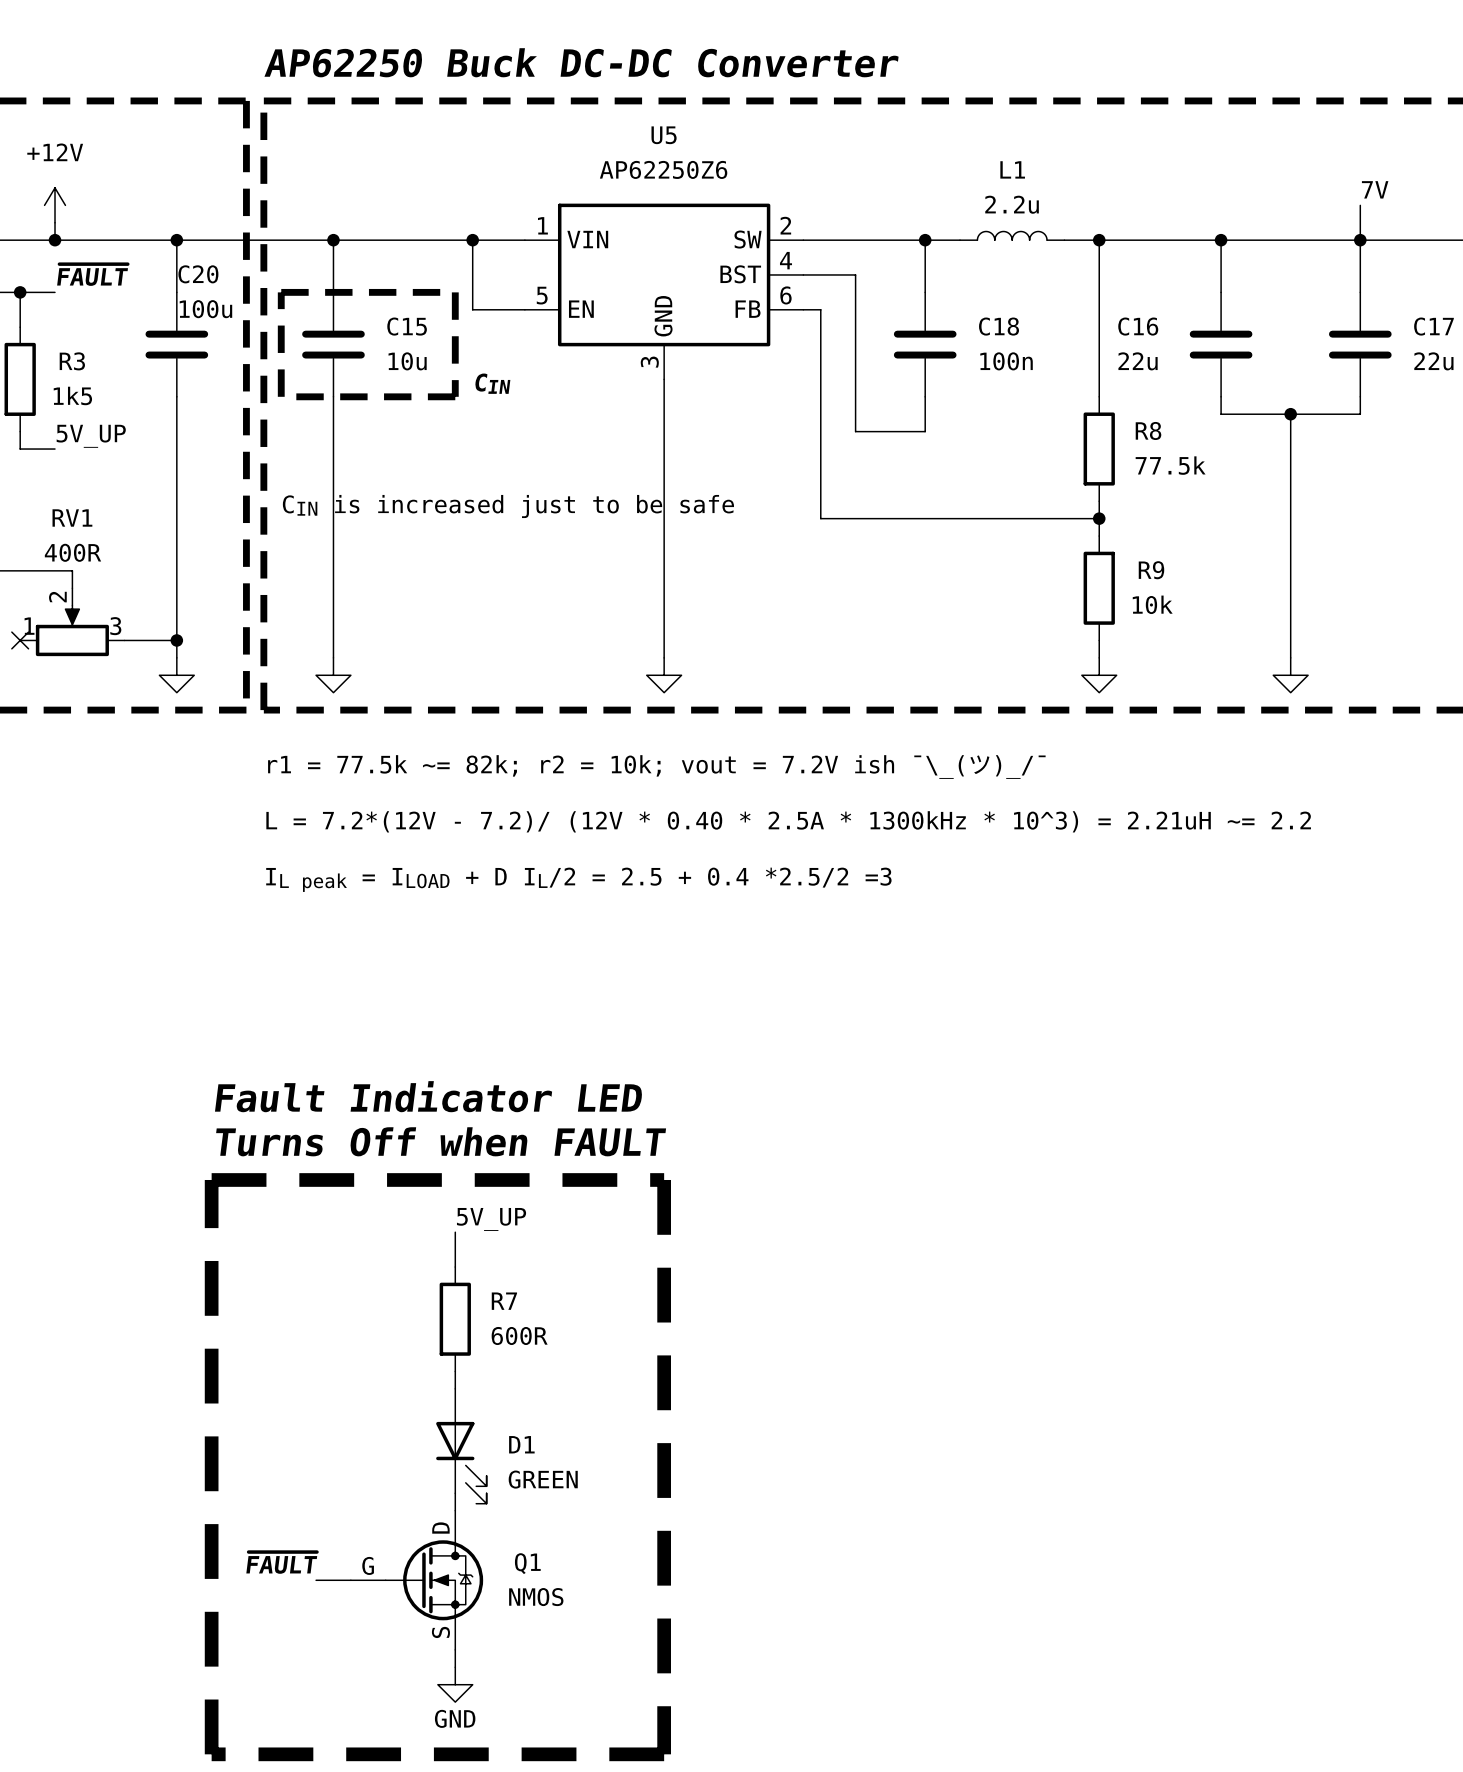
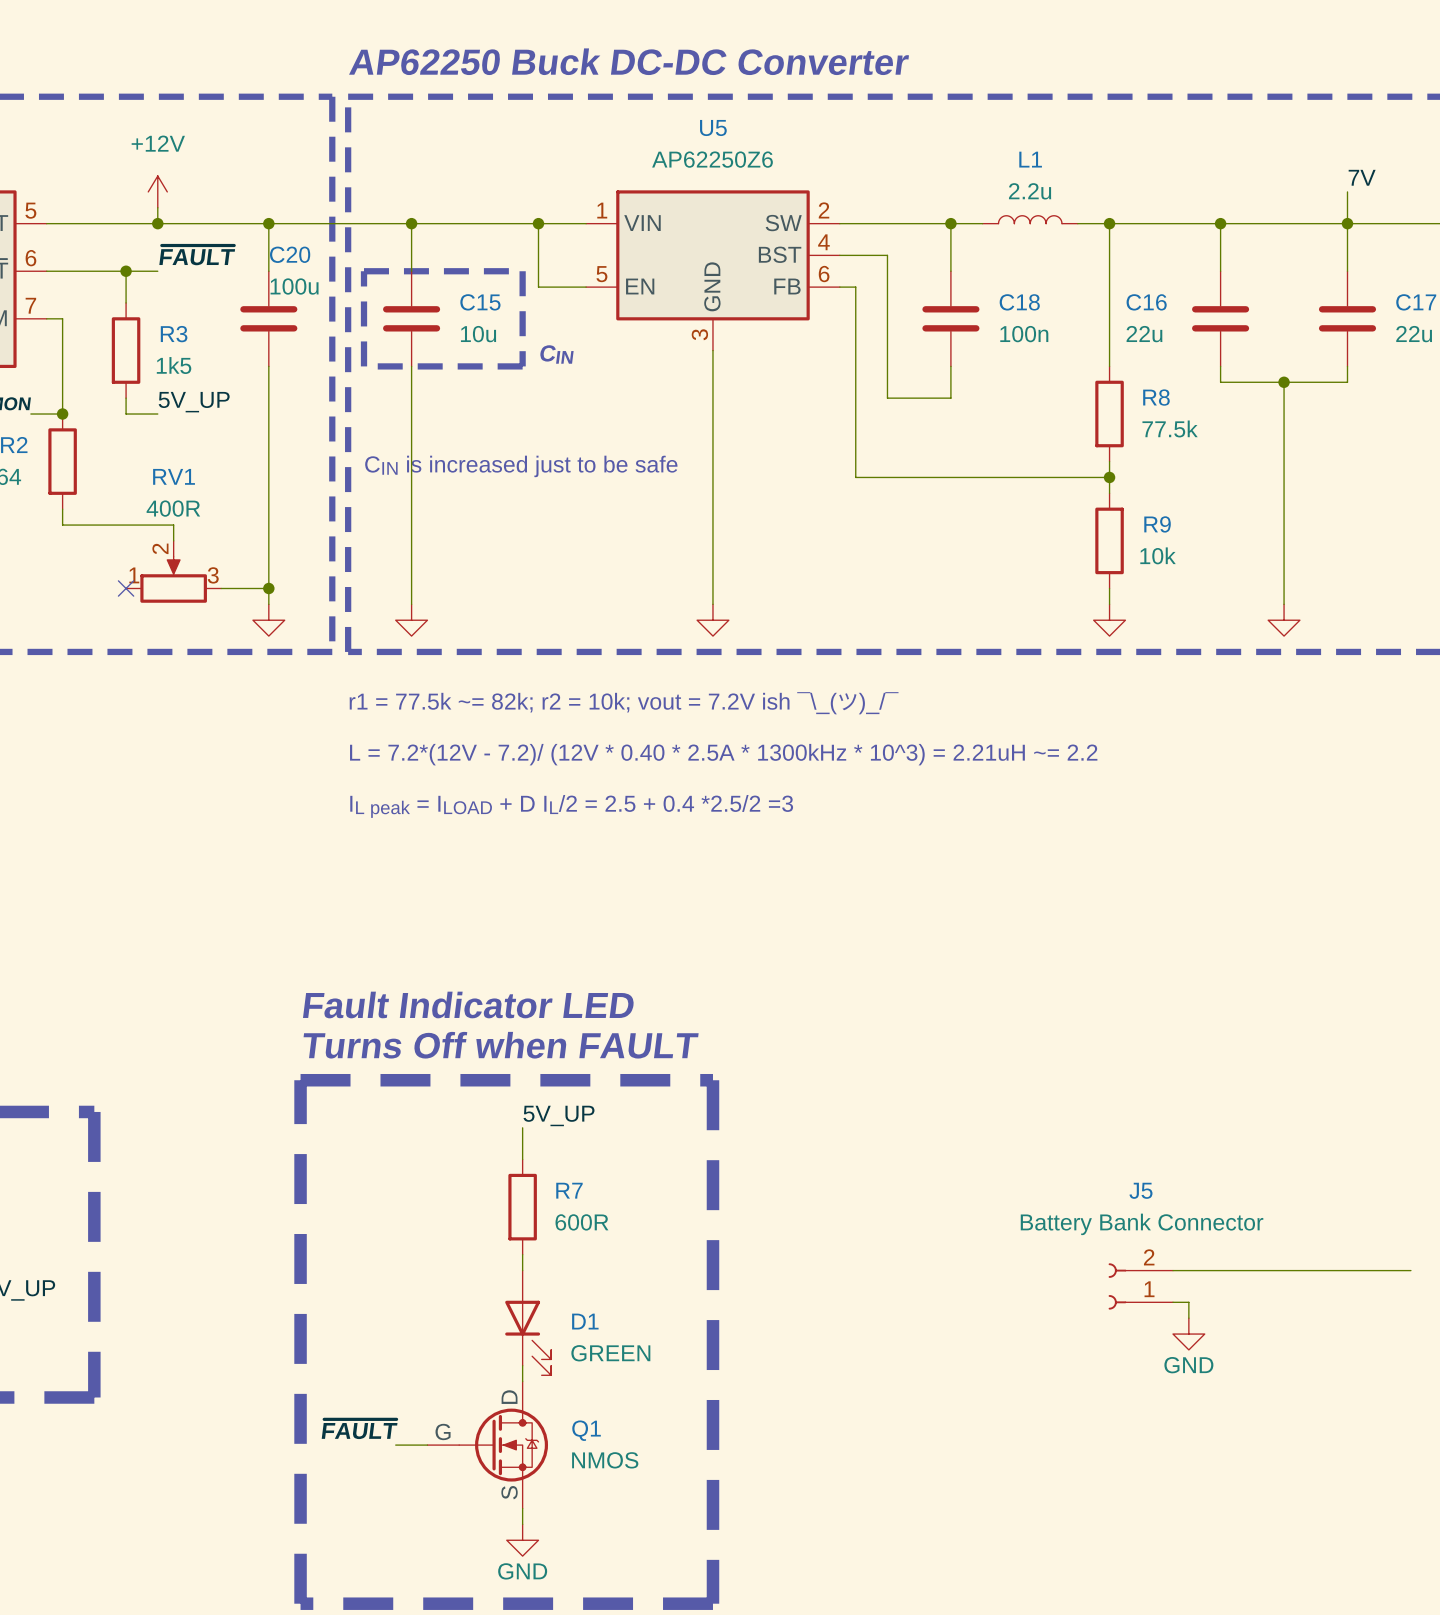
wire: none -> (1173, 1270) (1410, 1270)
J5: none -> Battery Bank Connector (1140, 1286)
wire: none -> (1173, 1302) (1188, 1302) (1188, 1318)
power symbol: none -> GND (1188, 1334)

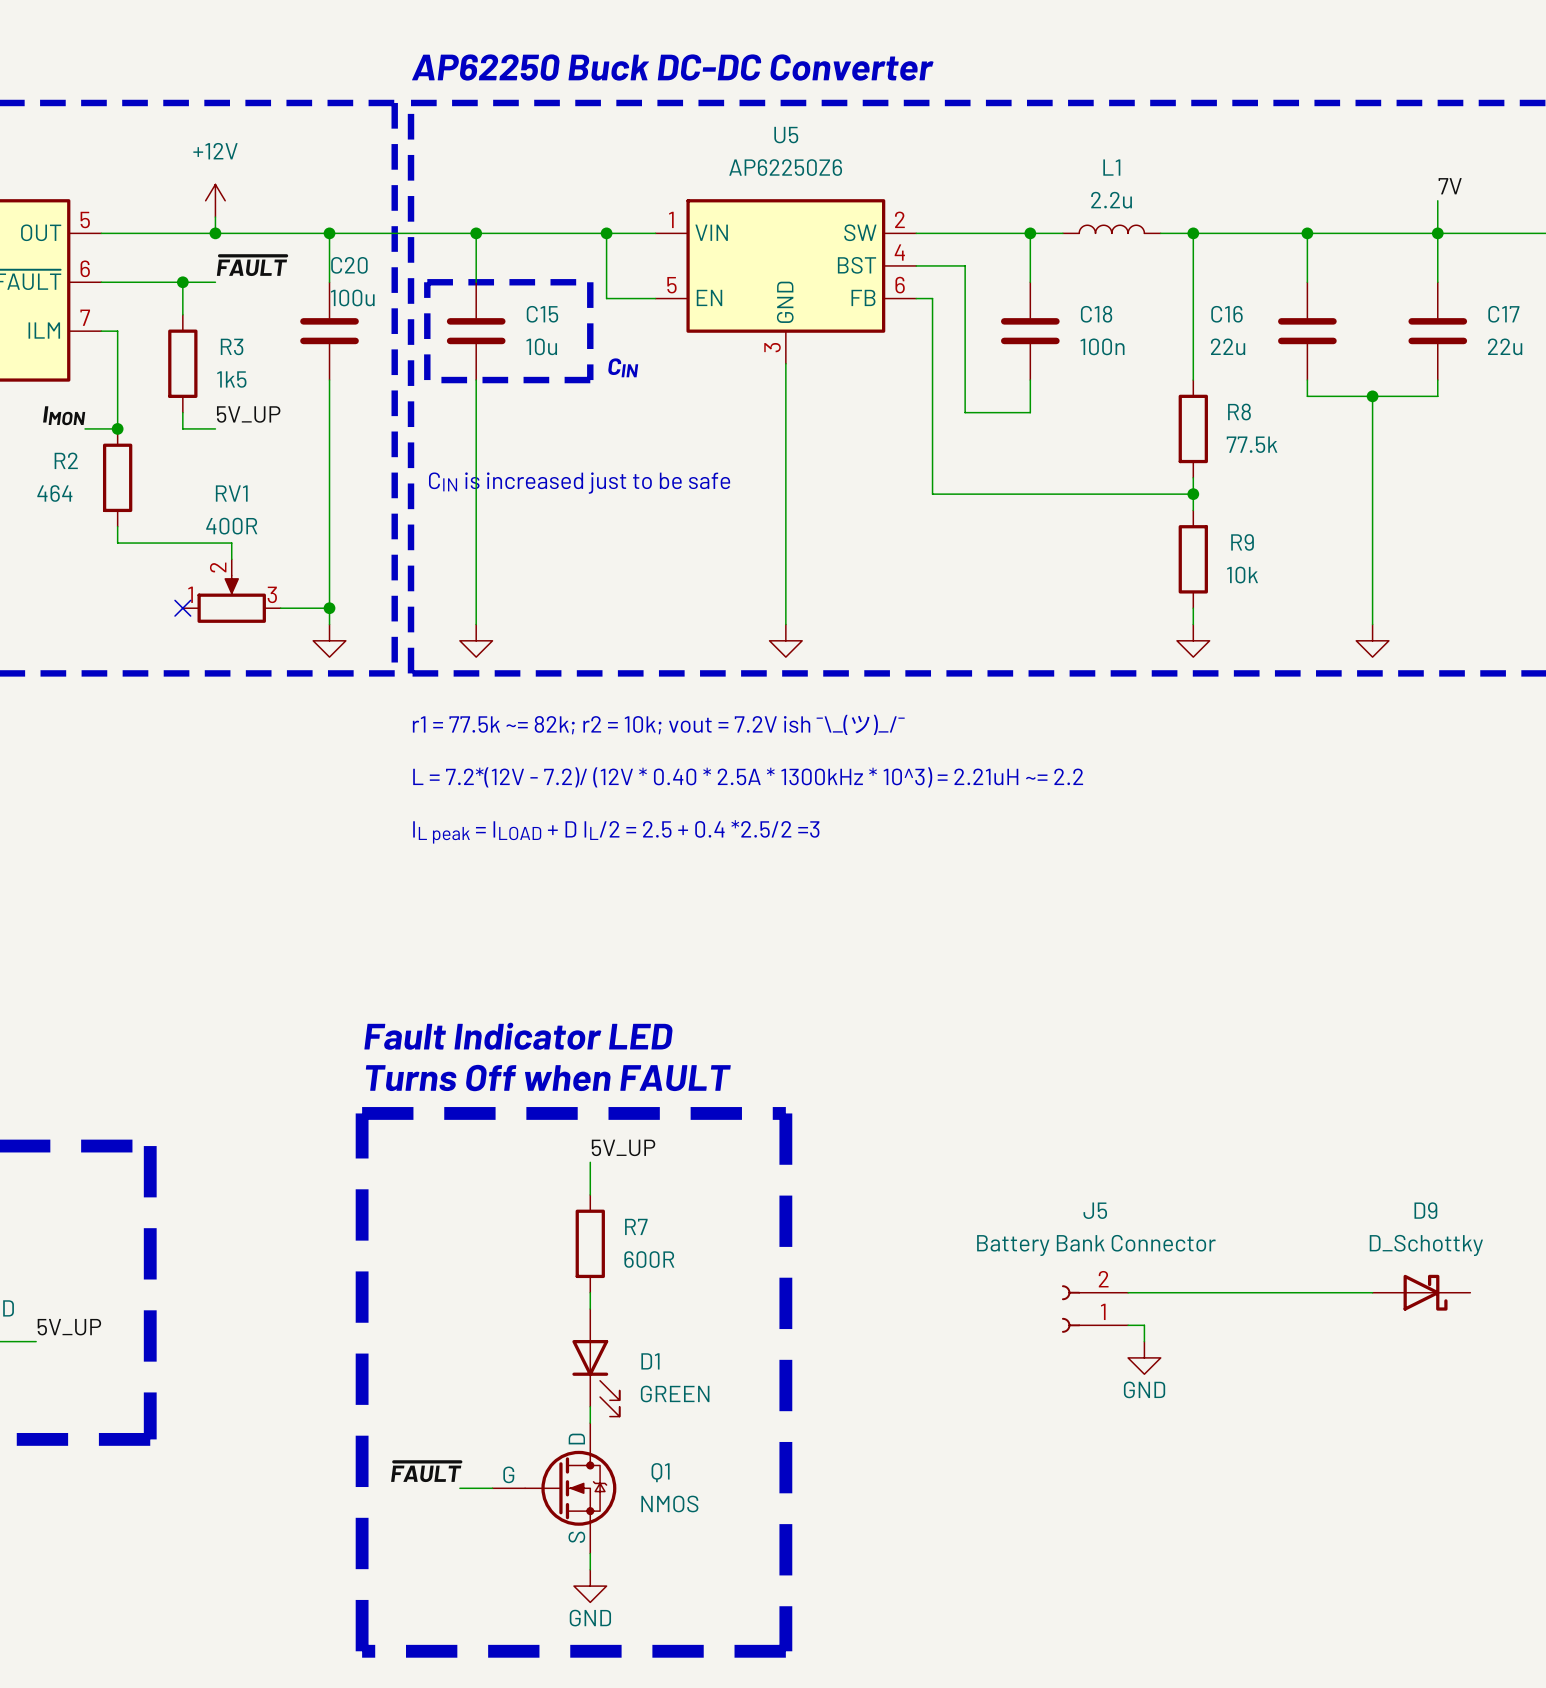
D9: none -> D_Schottky (1421, 1292)
wire: (1173, 1270) (1410, 1270) -> (1128, 1292) (1372, 1292)
J5 position: (1140, 1286) -> (1095, 1309)
wire: (1173, 1302) (1188, 1302) (1188, 1318) -> (1128, 1325) (1144, 1325) (1144, 1341)
power symbol position: GND (1188, 1334) -> GND (1144, 1357)

